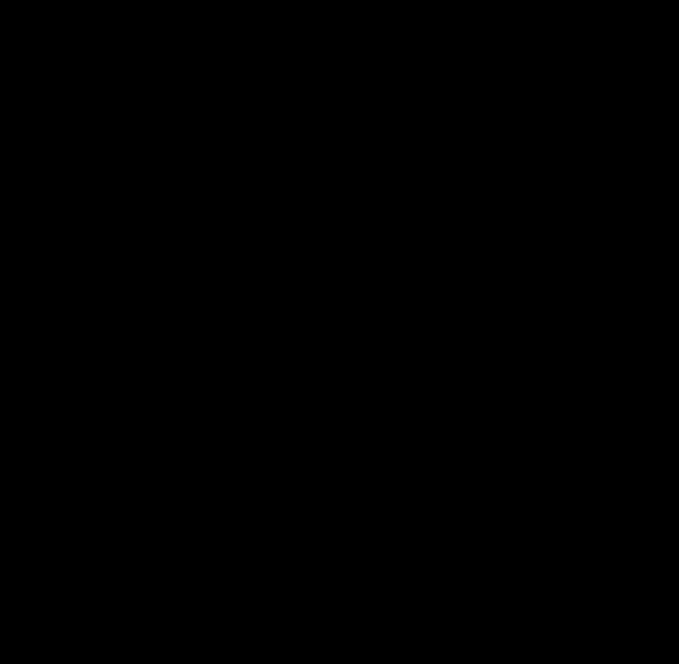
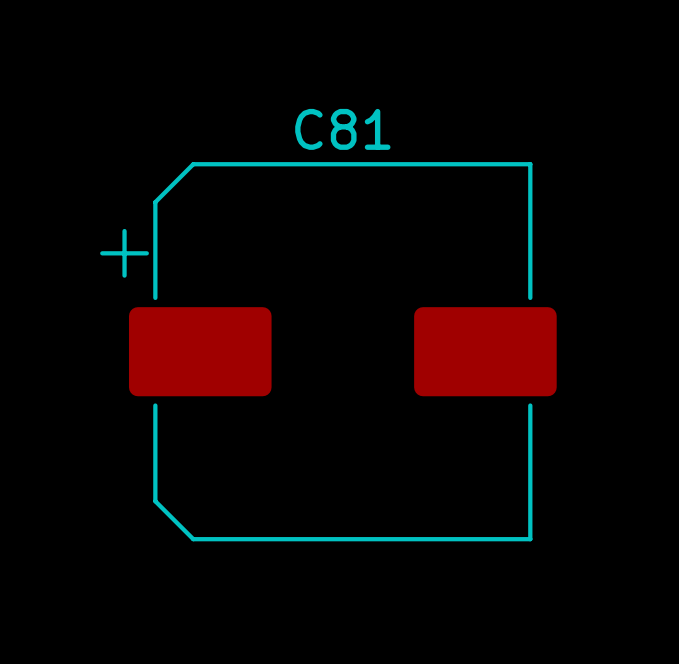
C81: none -> (328, 351)

